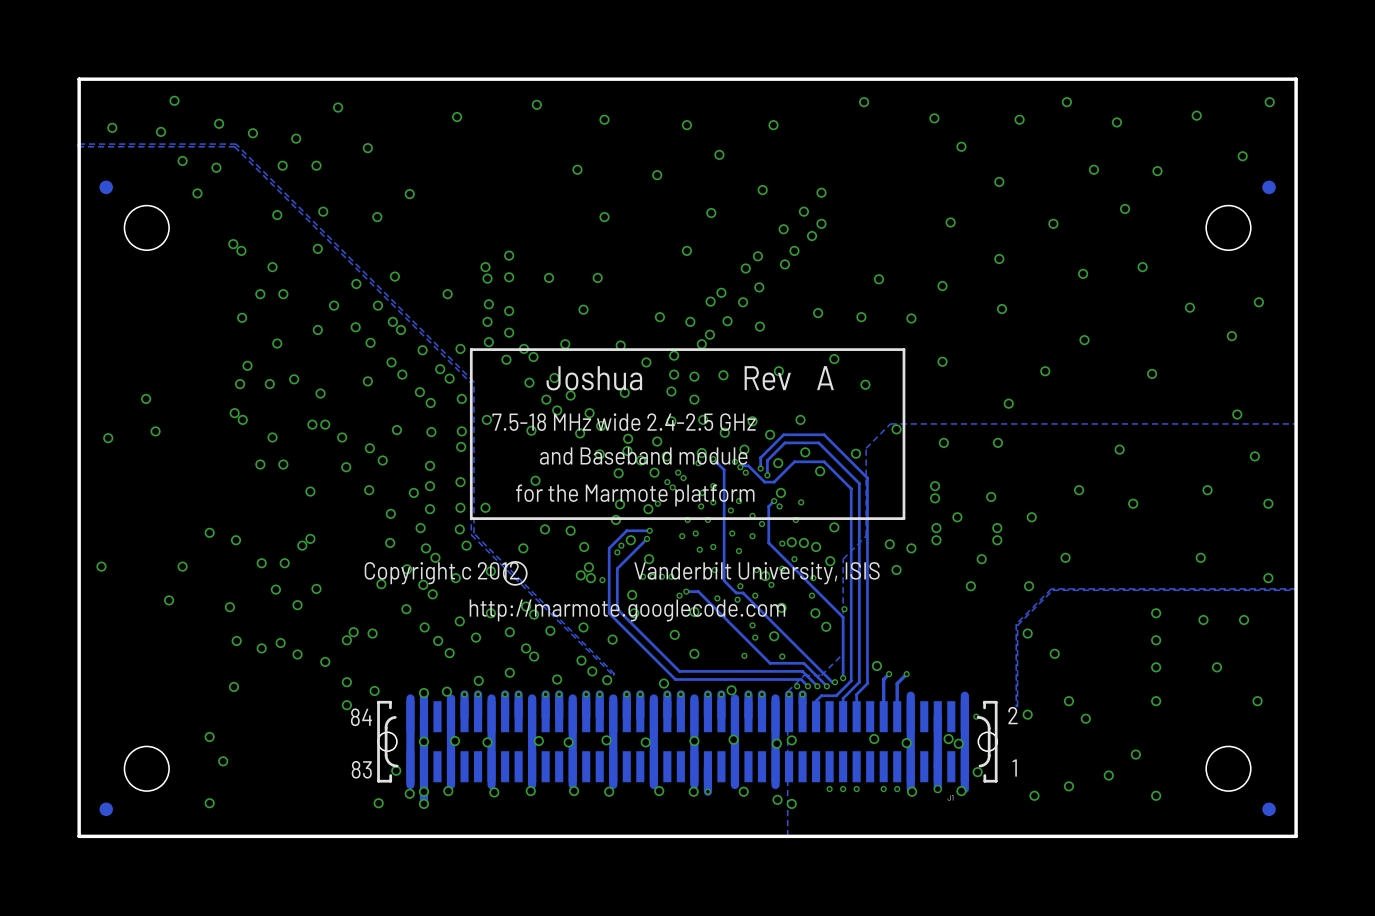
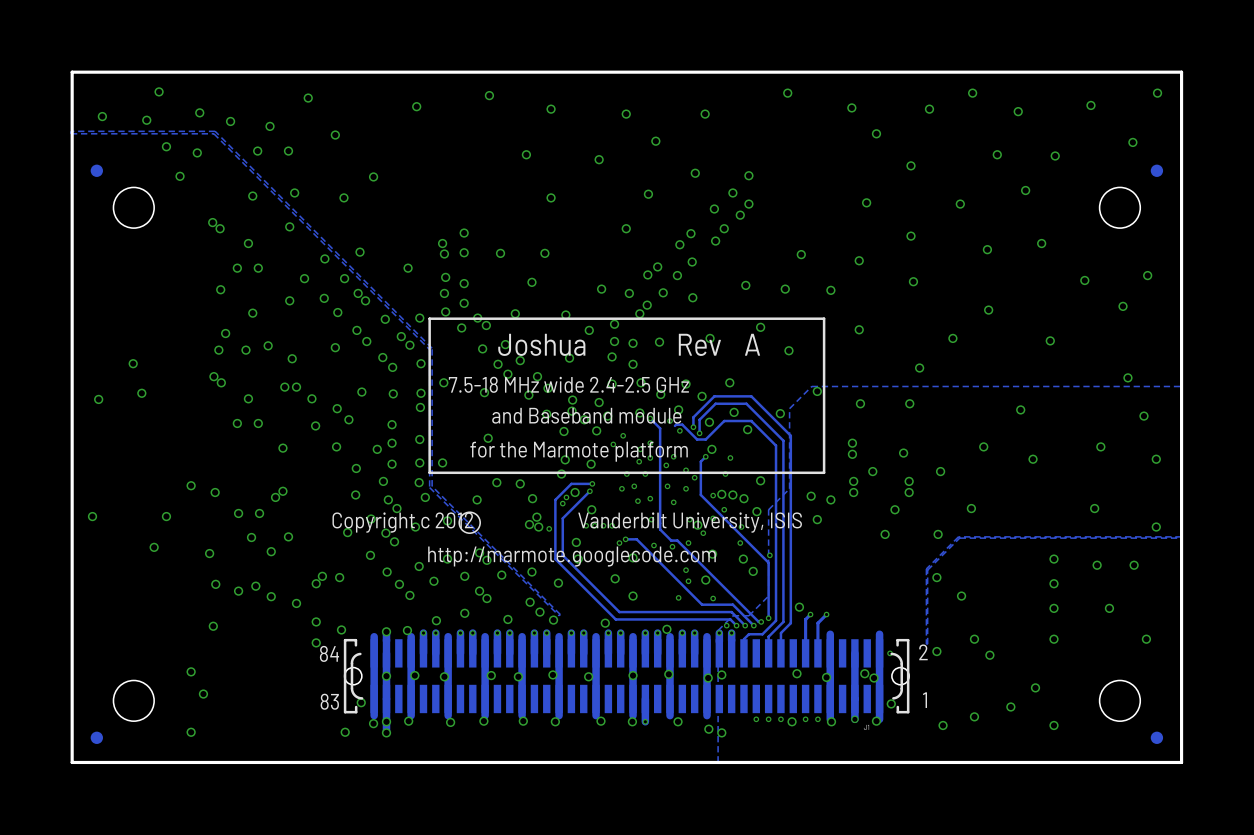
via: (698, 463) -> none
via: (740, 467) -> none
via: (678, 472) -> none
via: (667, 482) -> none
via: (657, 503) -> none
via: (779, 506) -> none
via: (740, 586) -> none
via: none -> (792, 721)

